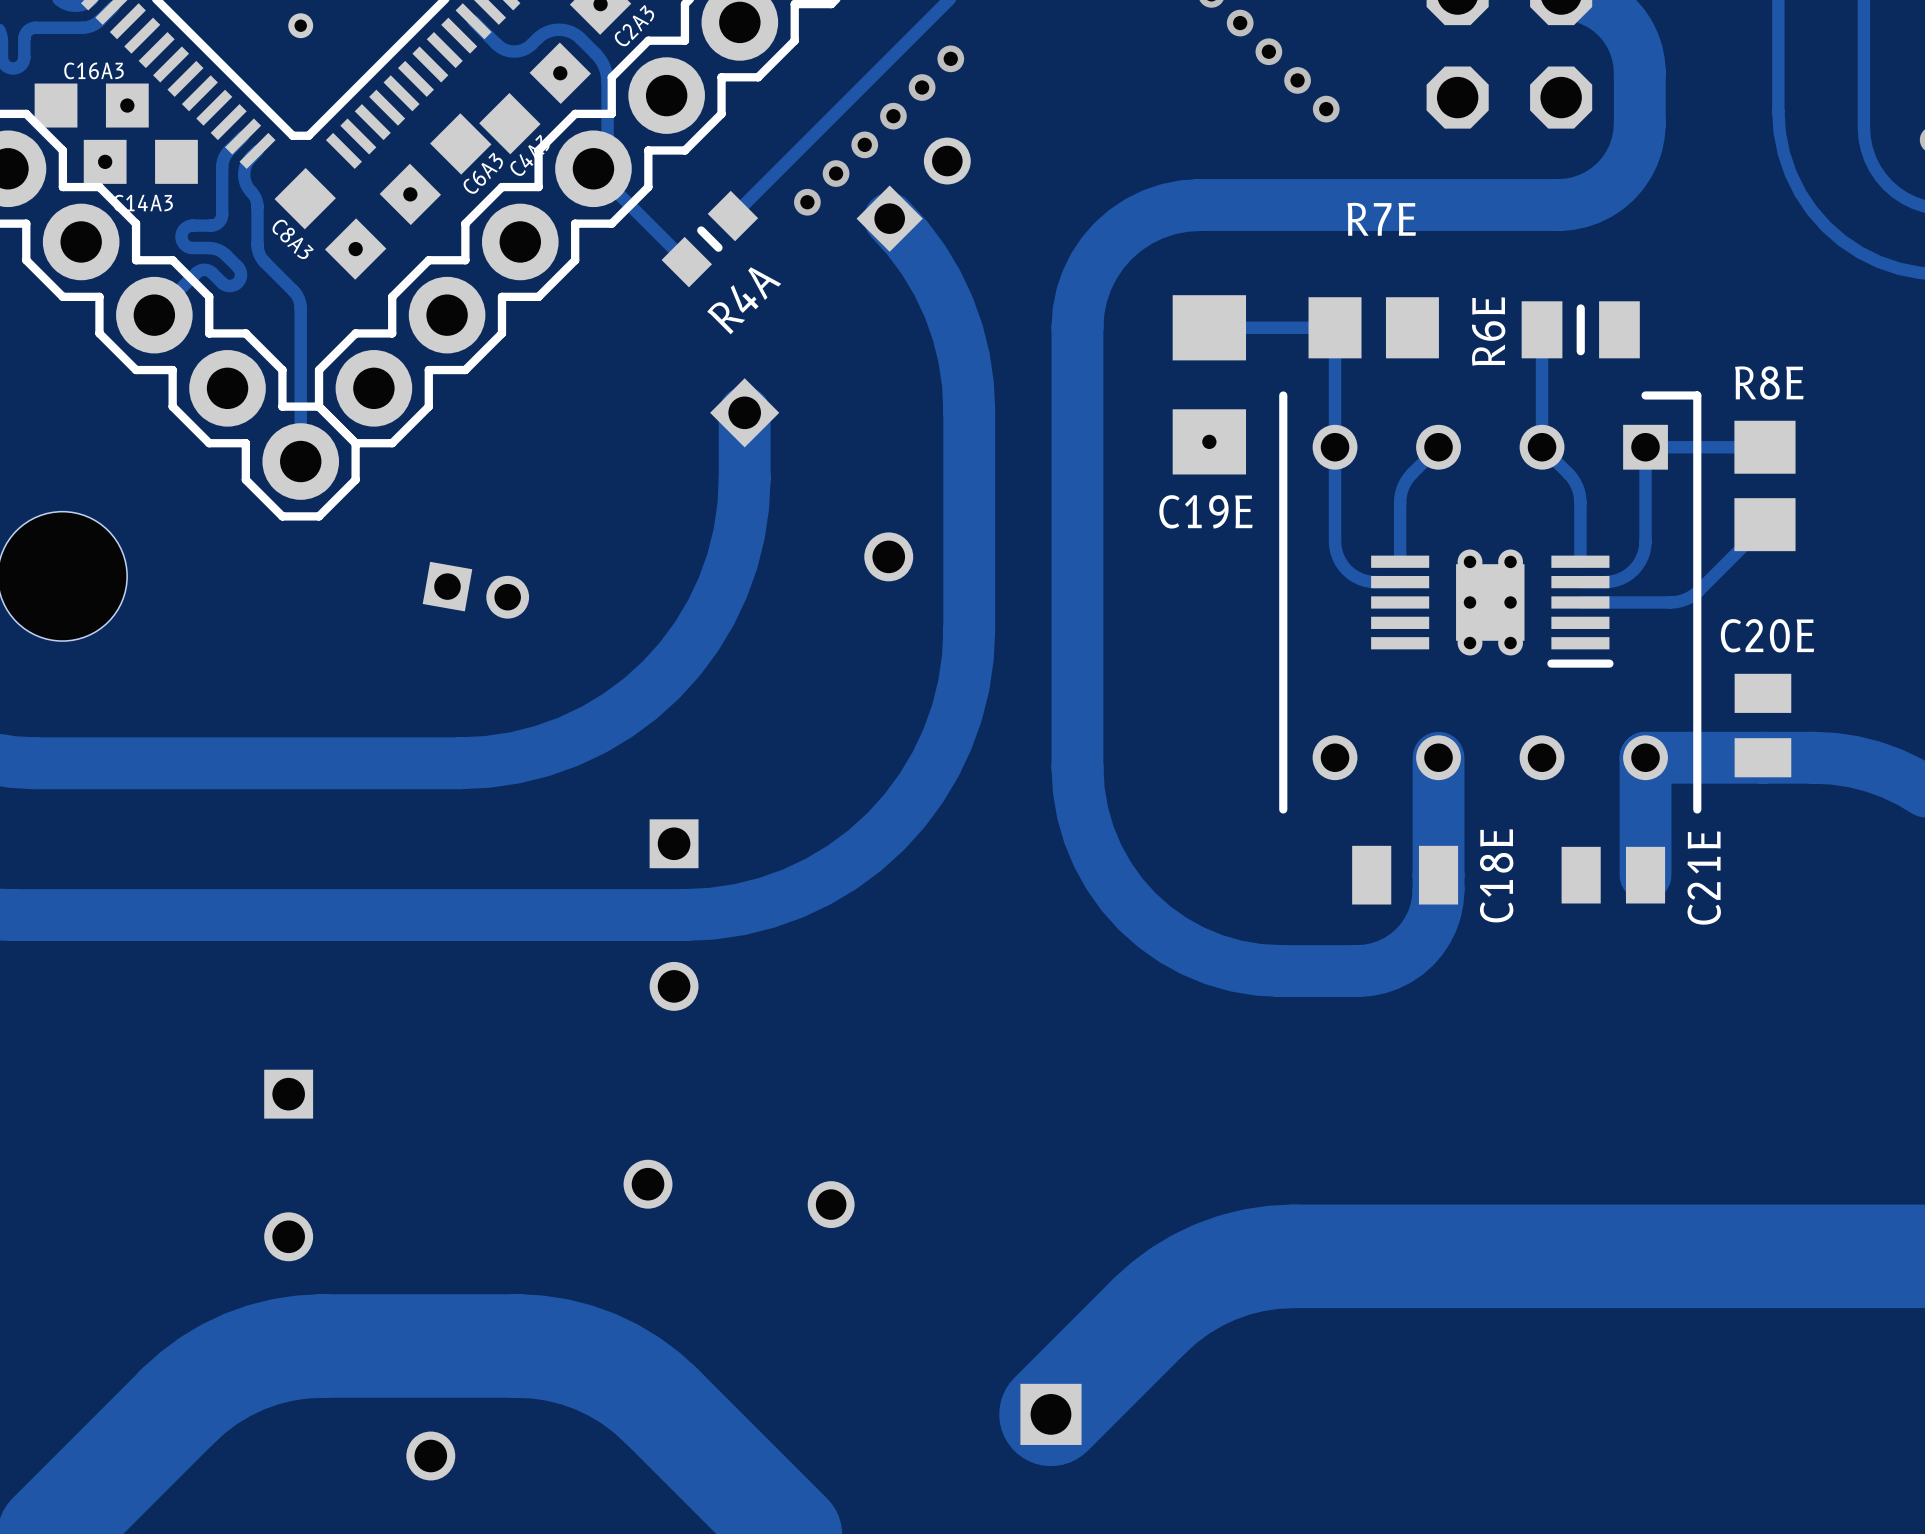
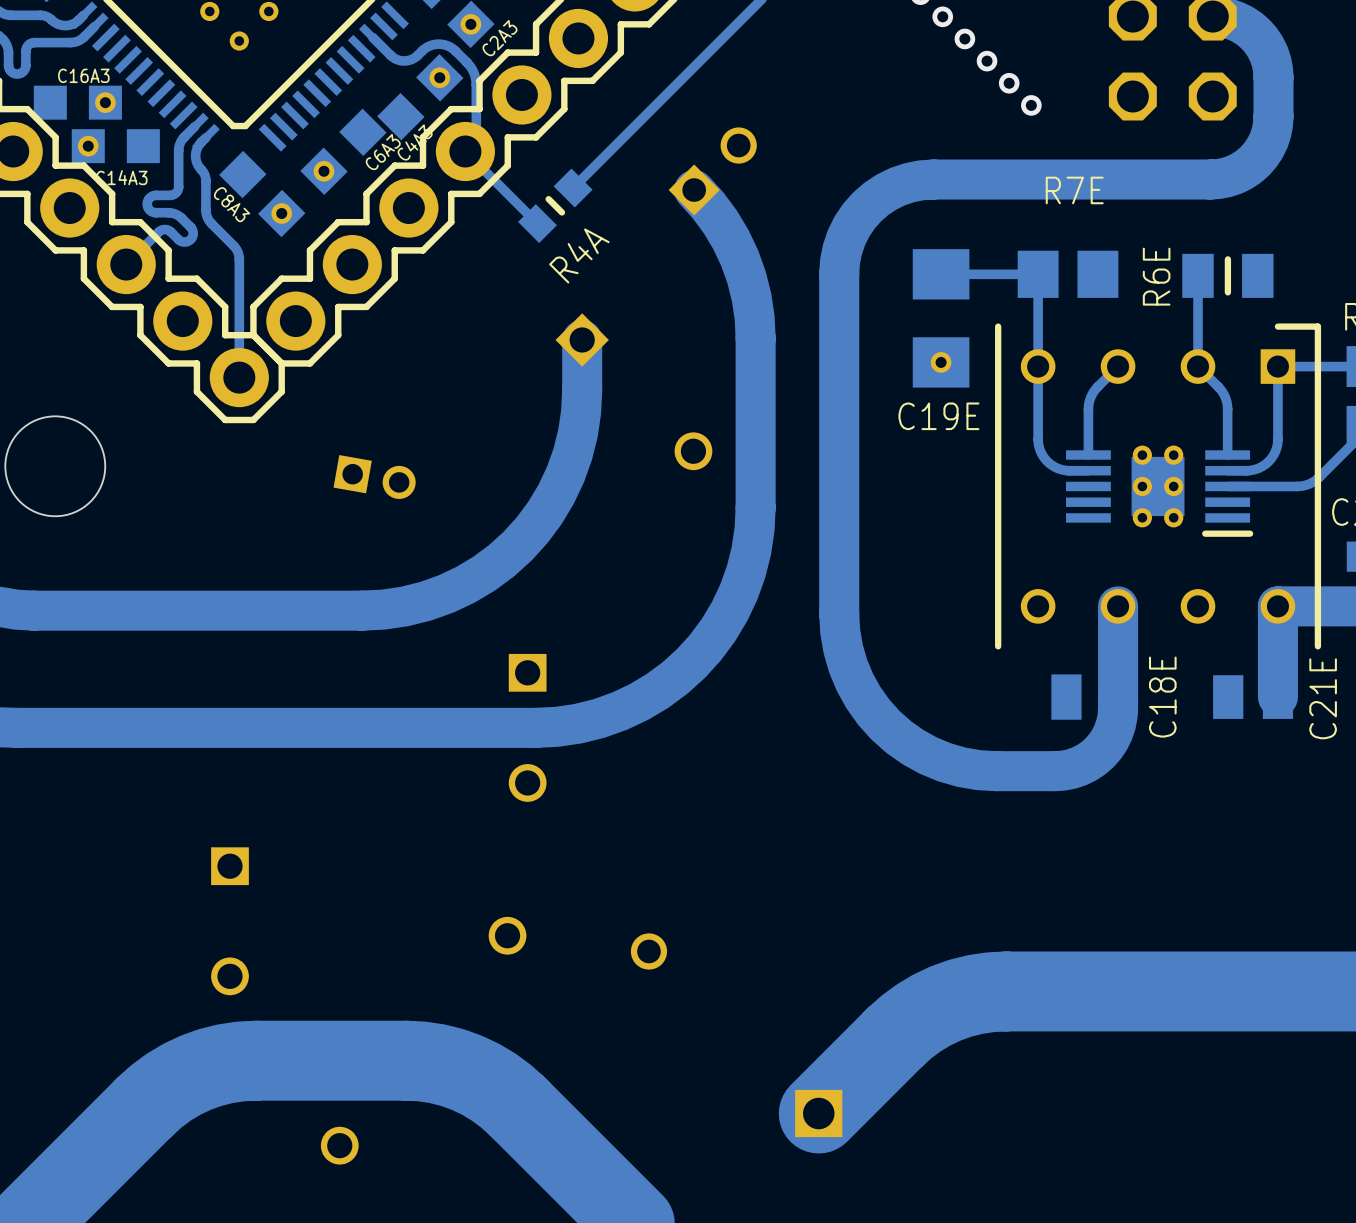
via: (950, 58) -> none
via: (922, 87) -> none
via: (893, 116) -> none
via: (864, 144) -> none
via: (836, 173) -> none
via: (807, 202) -> none

